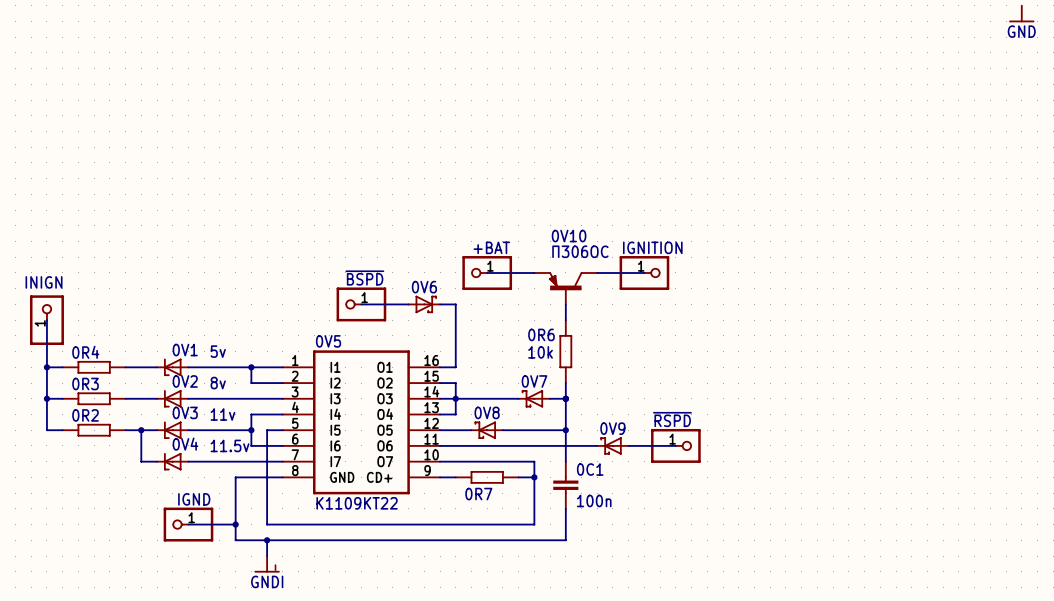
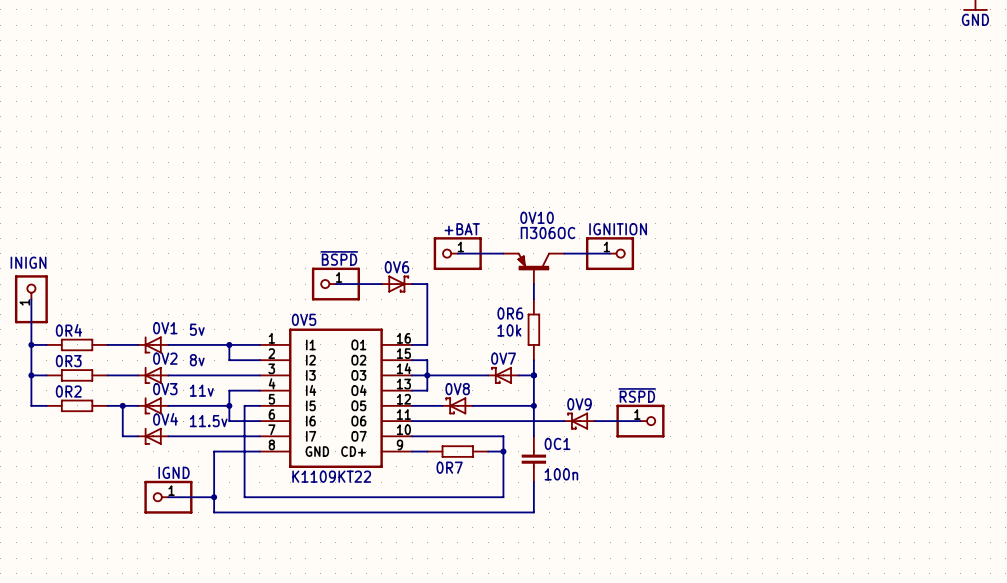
wire: (267, 540) (267, 556) -> none
junction: (267, 540) -> none
power symbol: GNDI (267, 564) -> none

